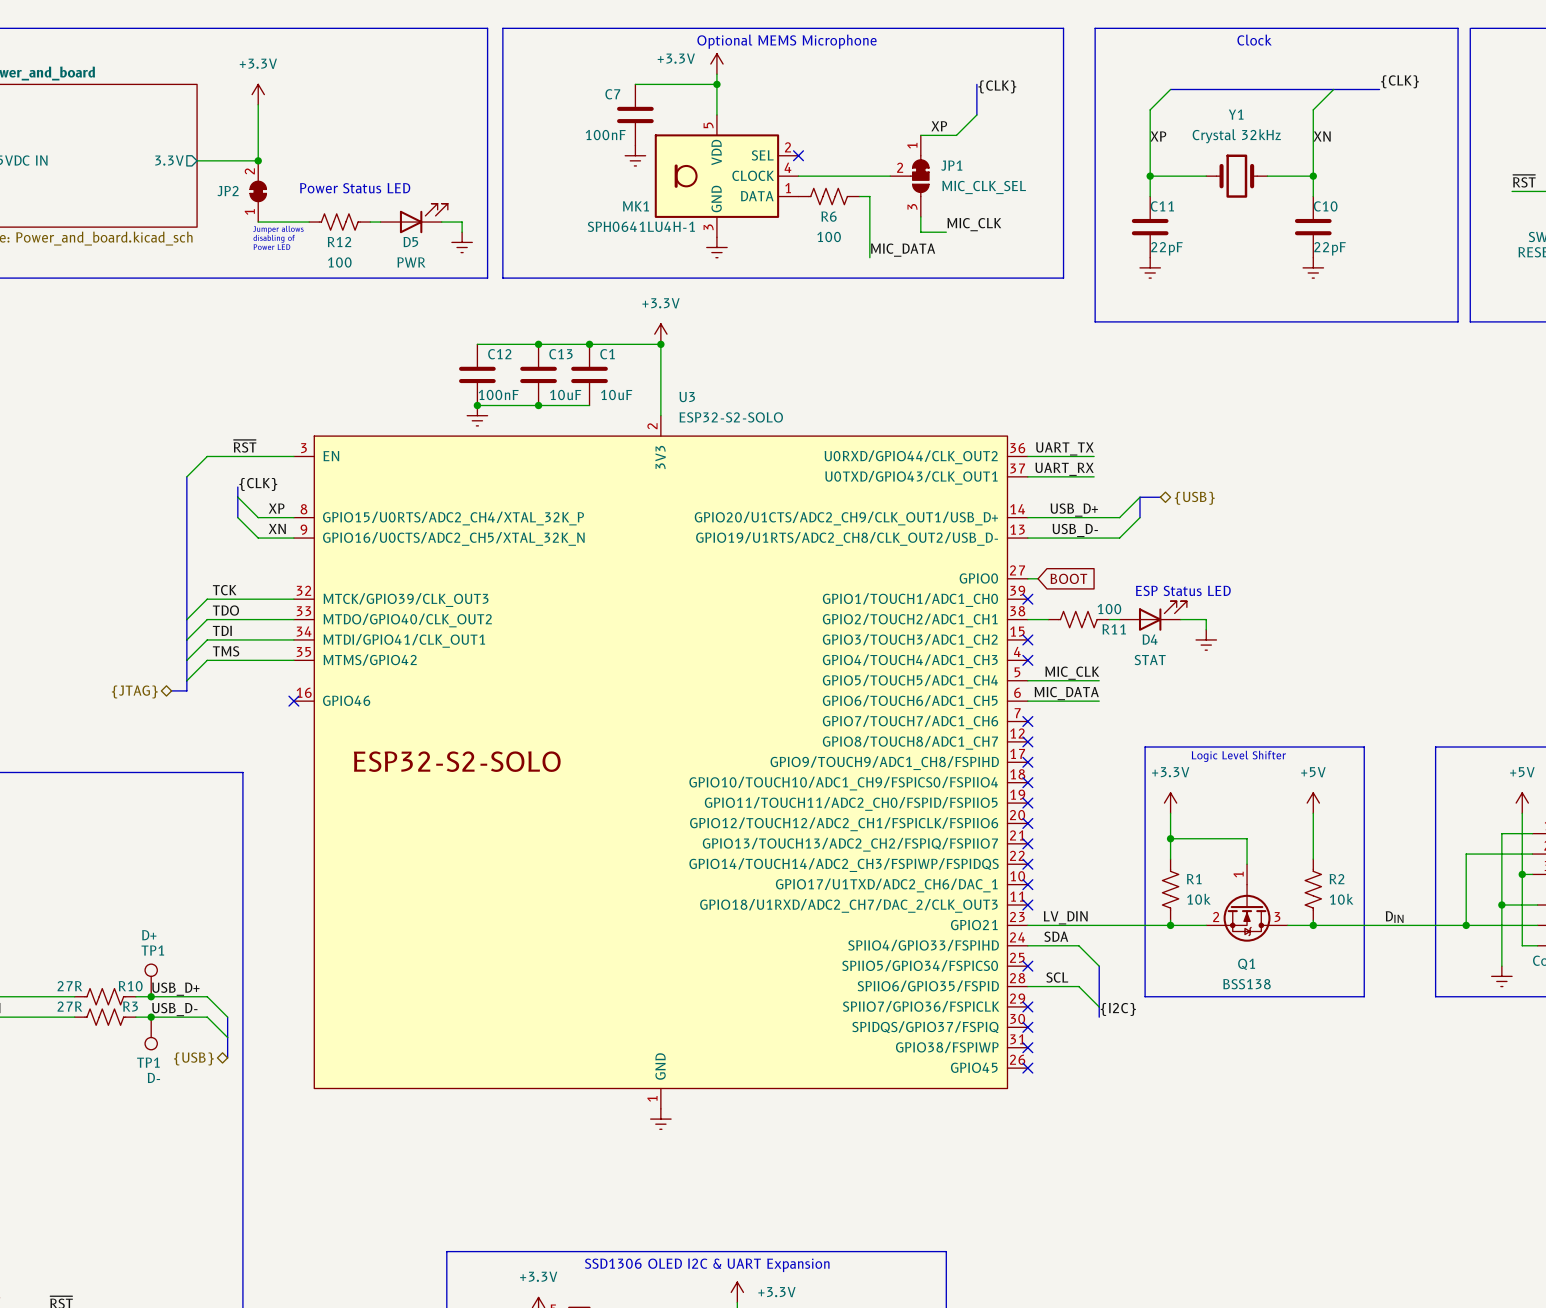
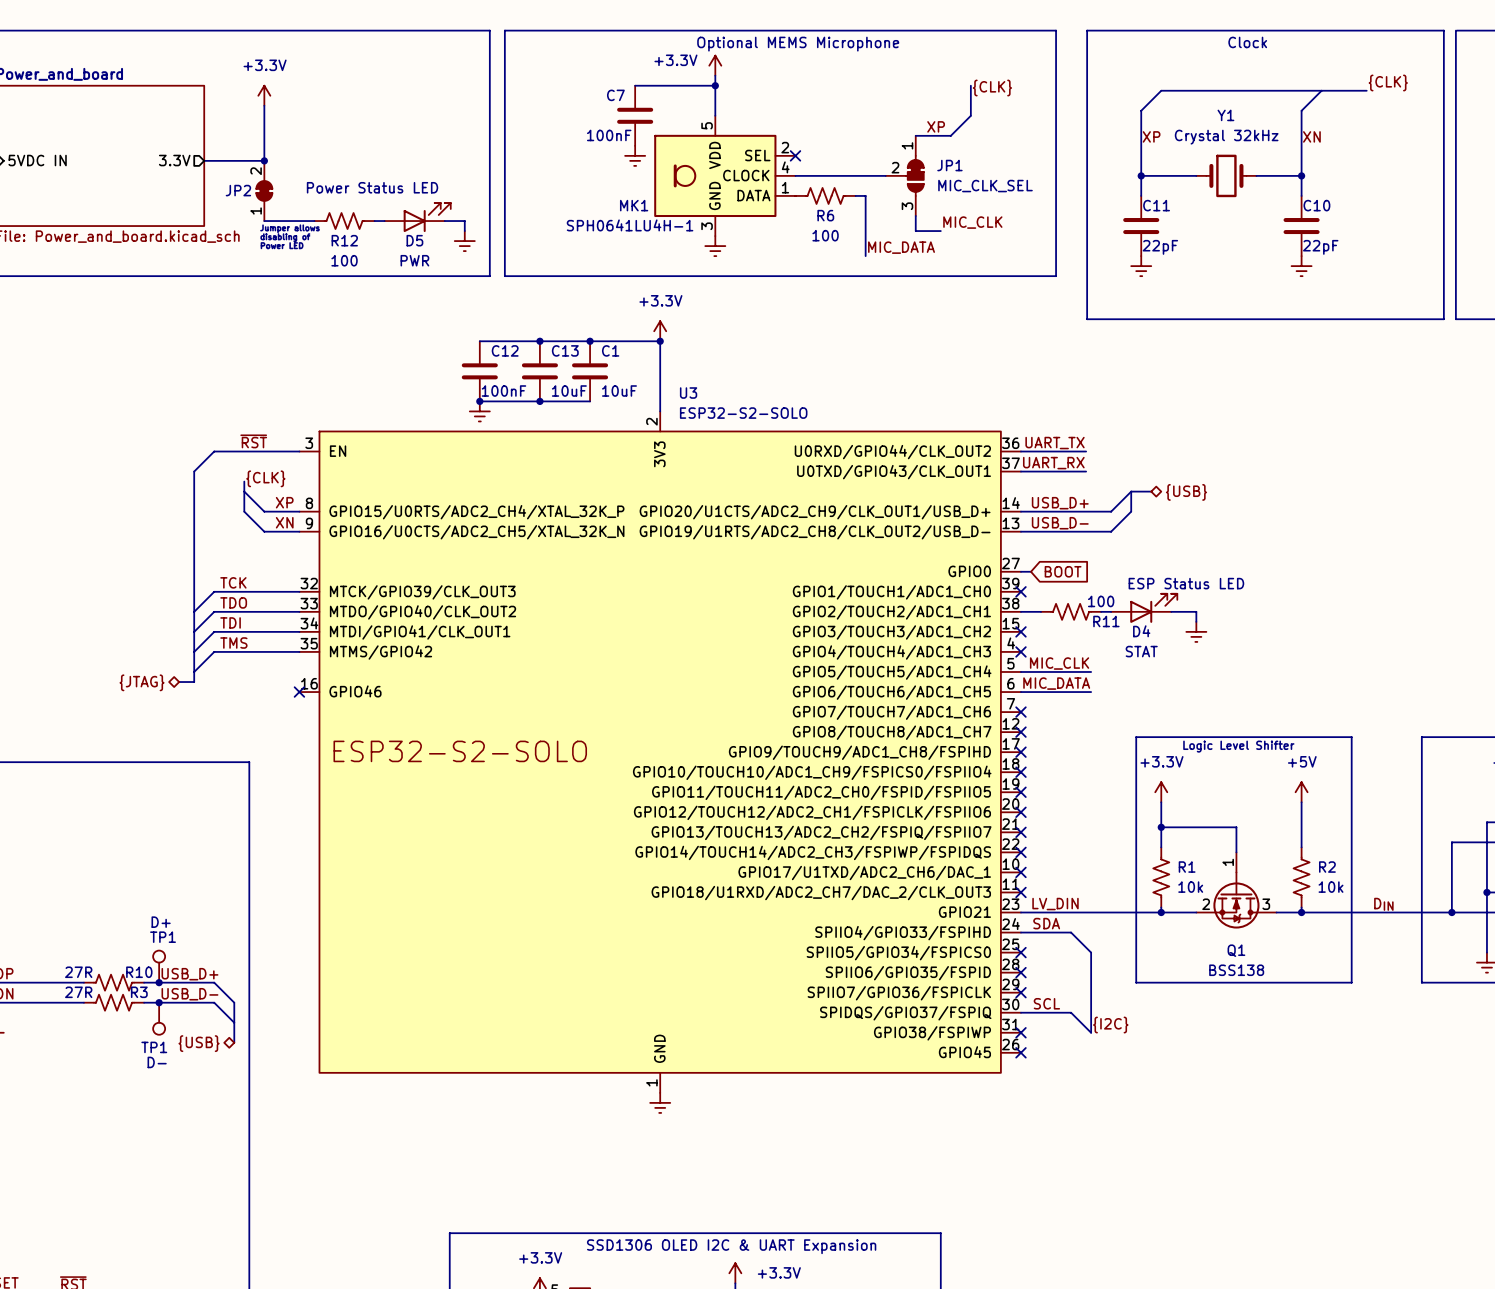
label position: SCL (1057, 977) -> SCL (1046, 1003)
wire: (1027, 986) (1078, 986) (1099, 1006) -> (1020, 1012) (1071, 1012) (1091, 1032)
label position: {I2C} (1118, 1009) -> {I2C} (1110, 1025)
bus: none -> (1091, 1002) (1091, 1032)
no-connect mark position: (1027, 1027) -> (1020, 972)

